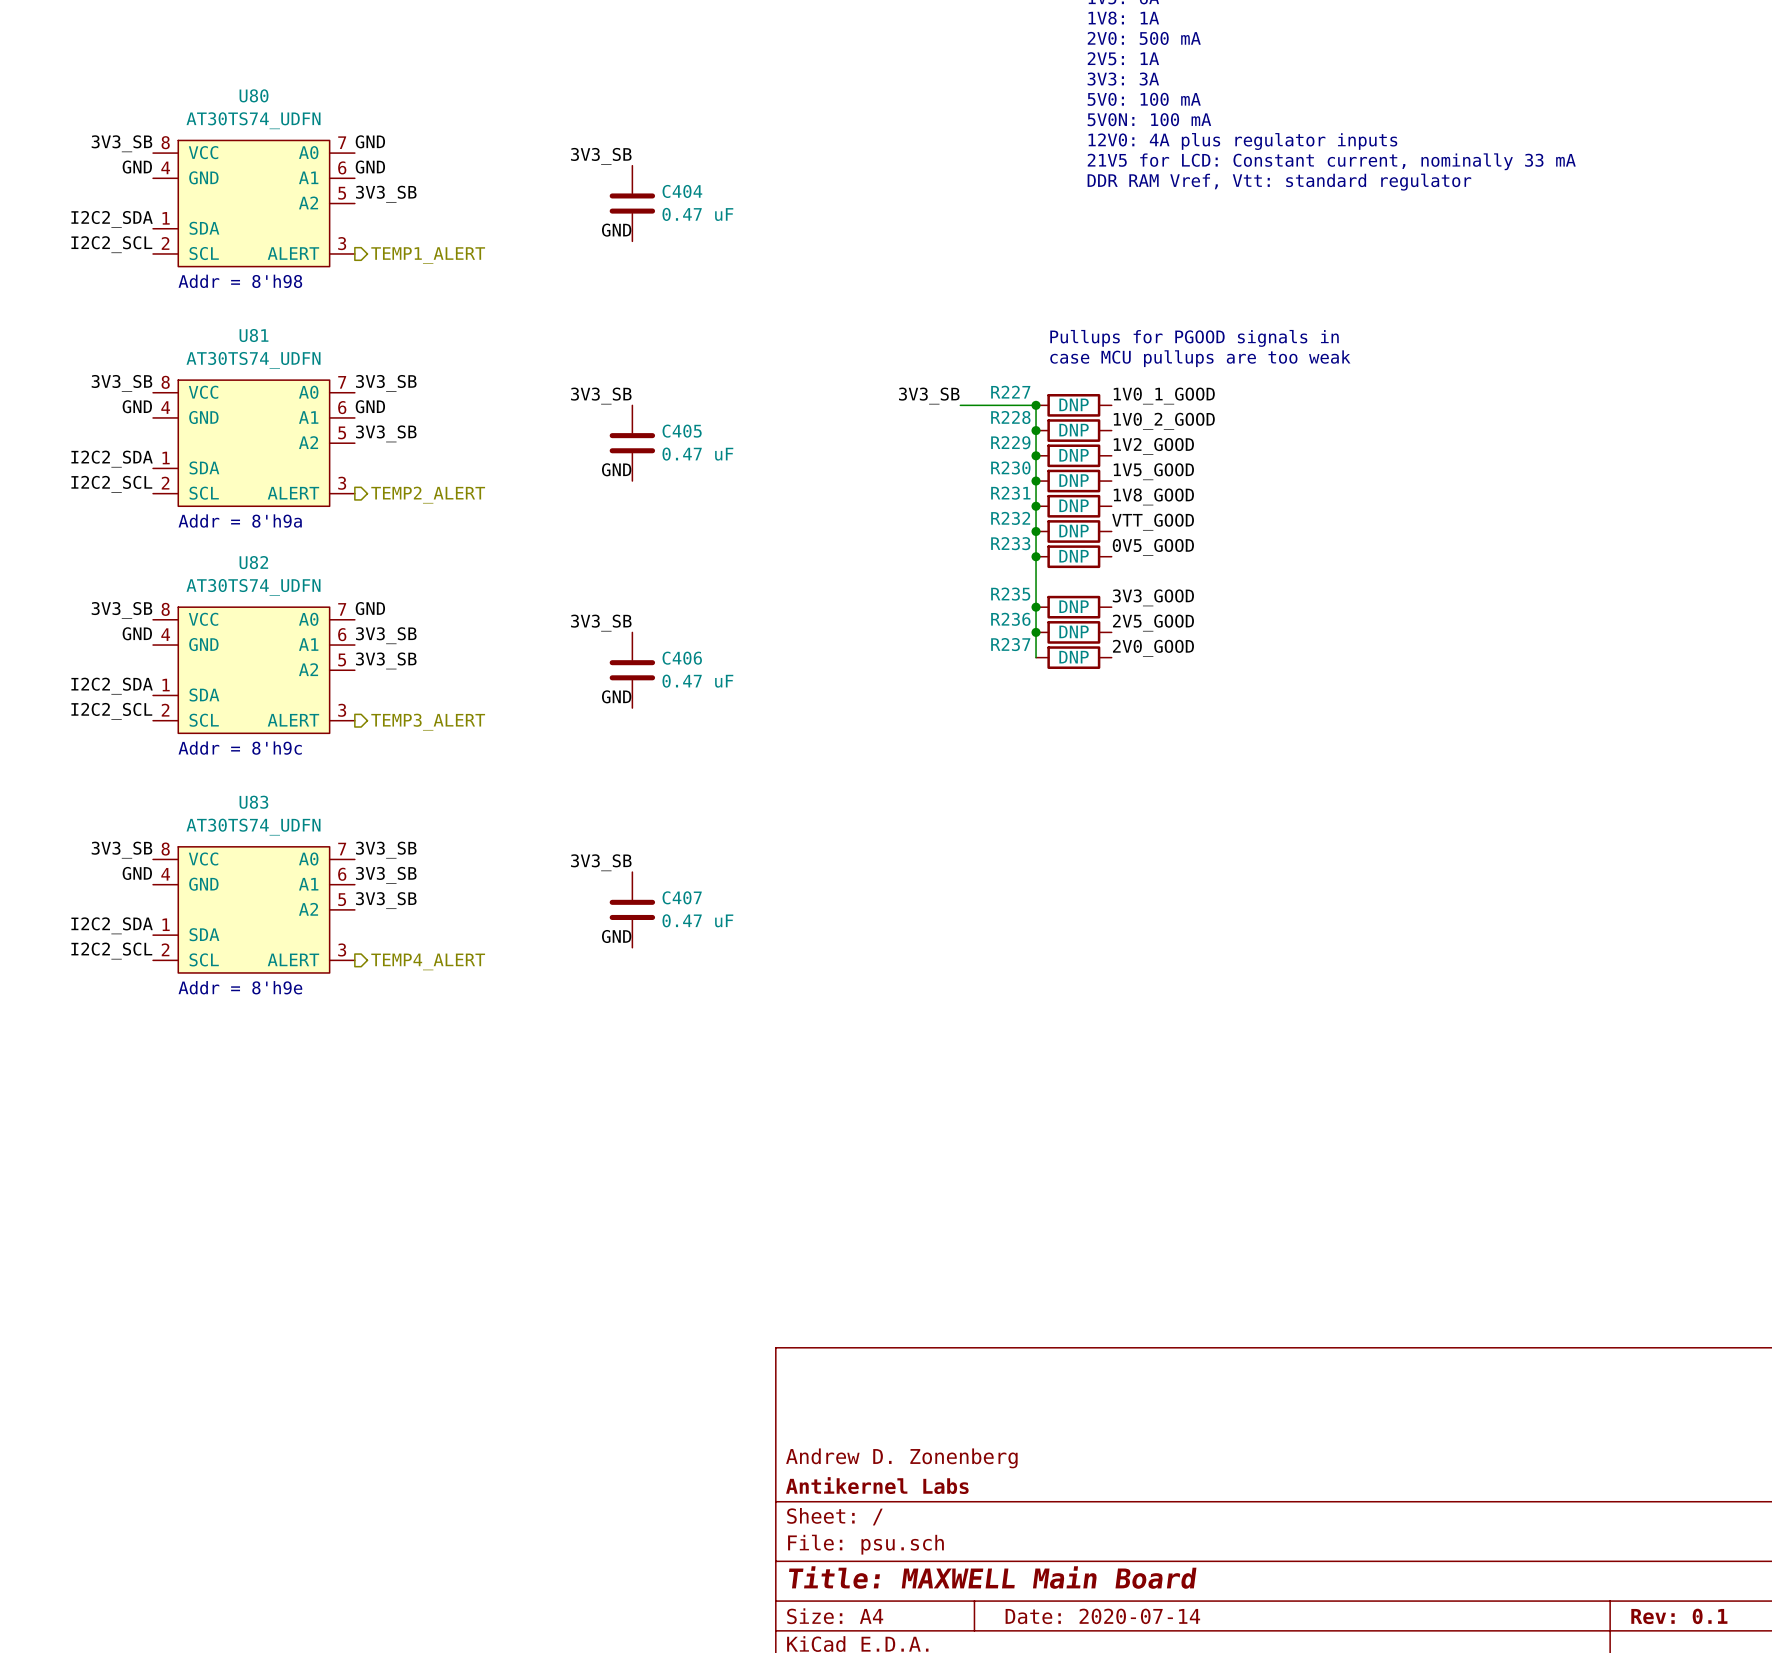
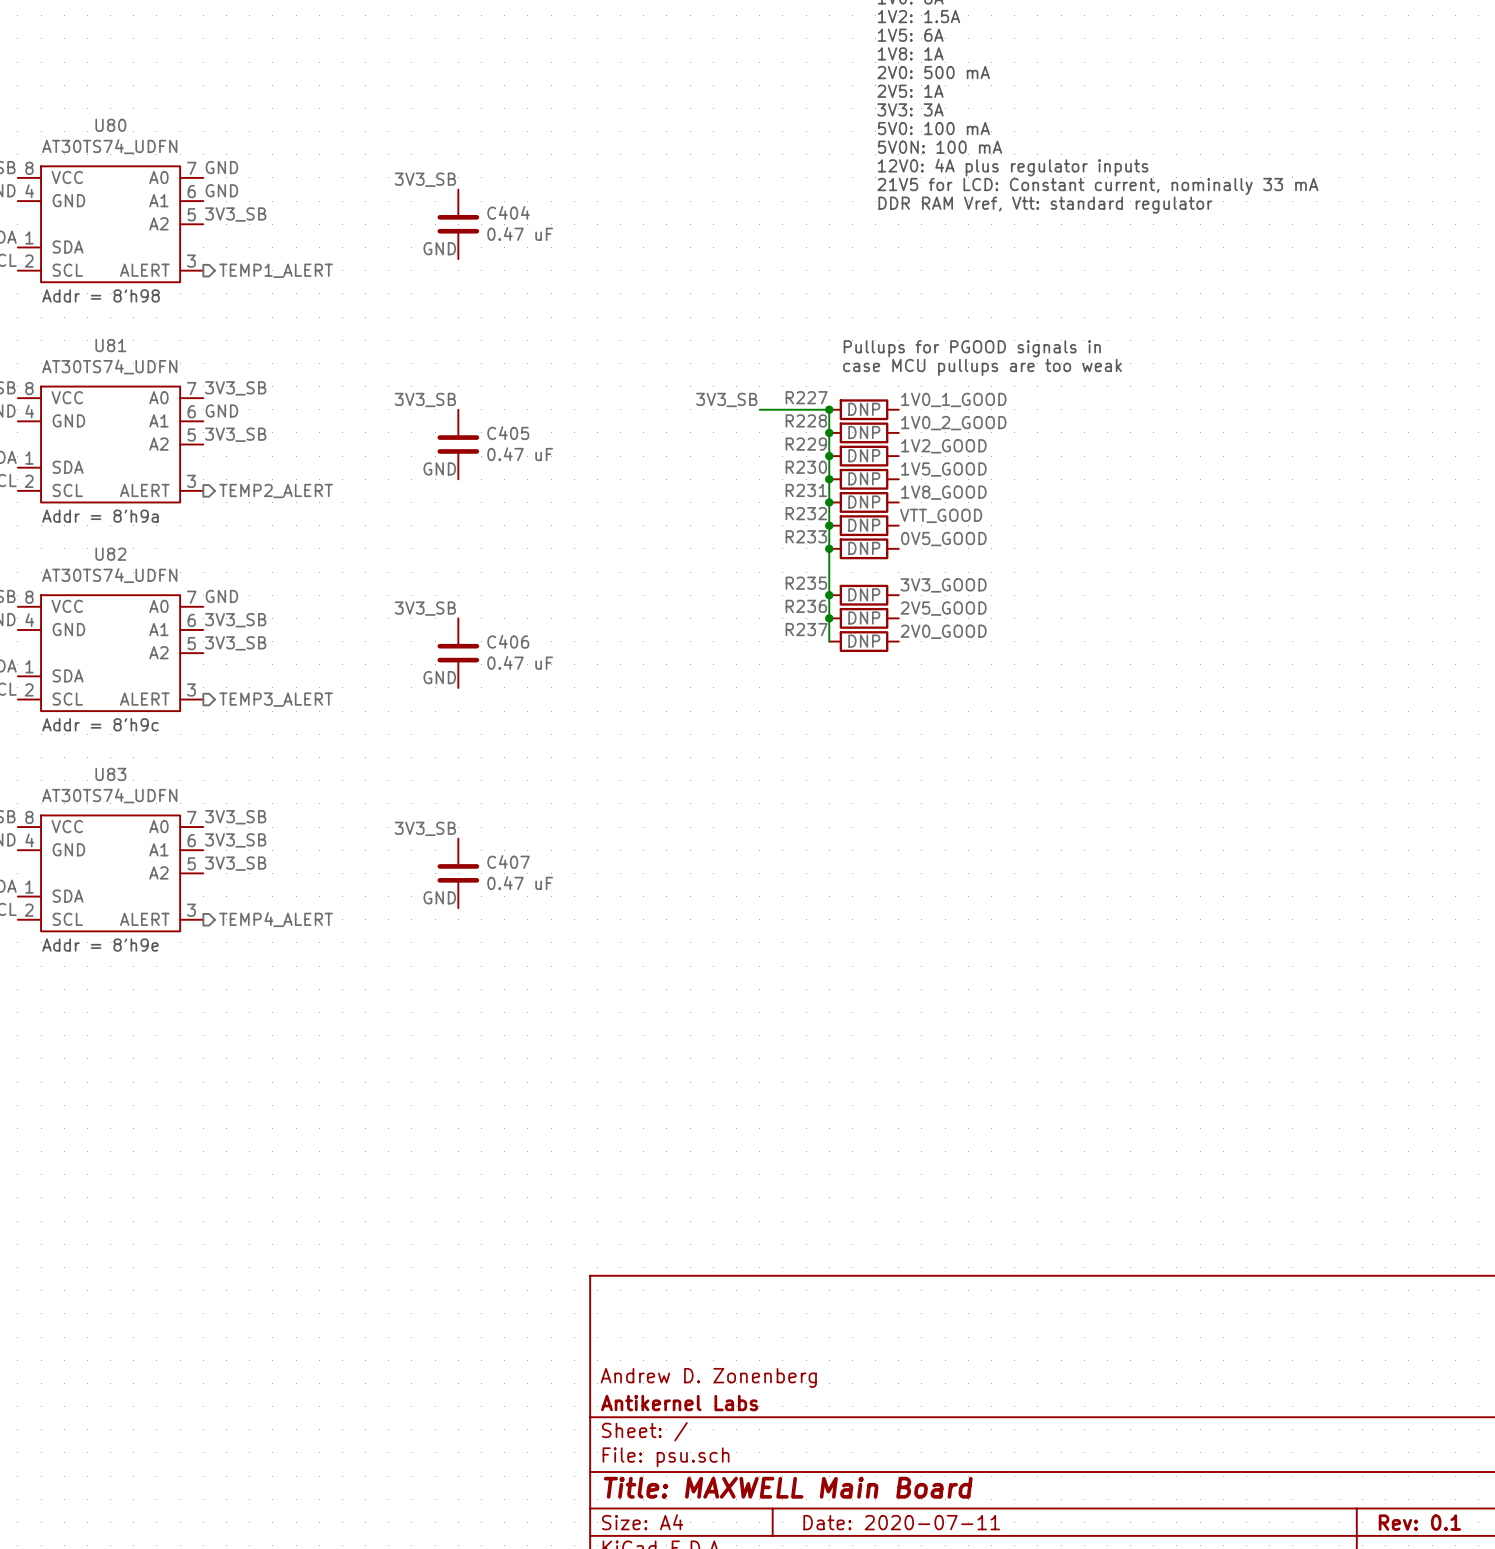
title block: Date: 2020-07-14 (1102, 1616) -> Date: 2020-07-11 (901, 1522)

